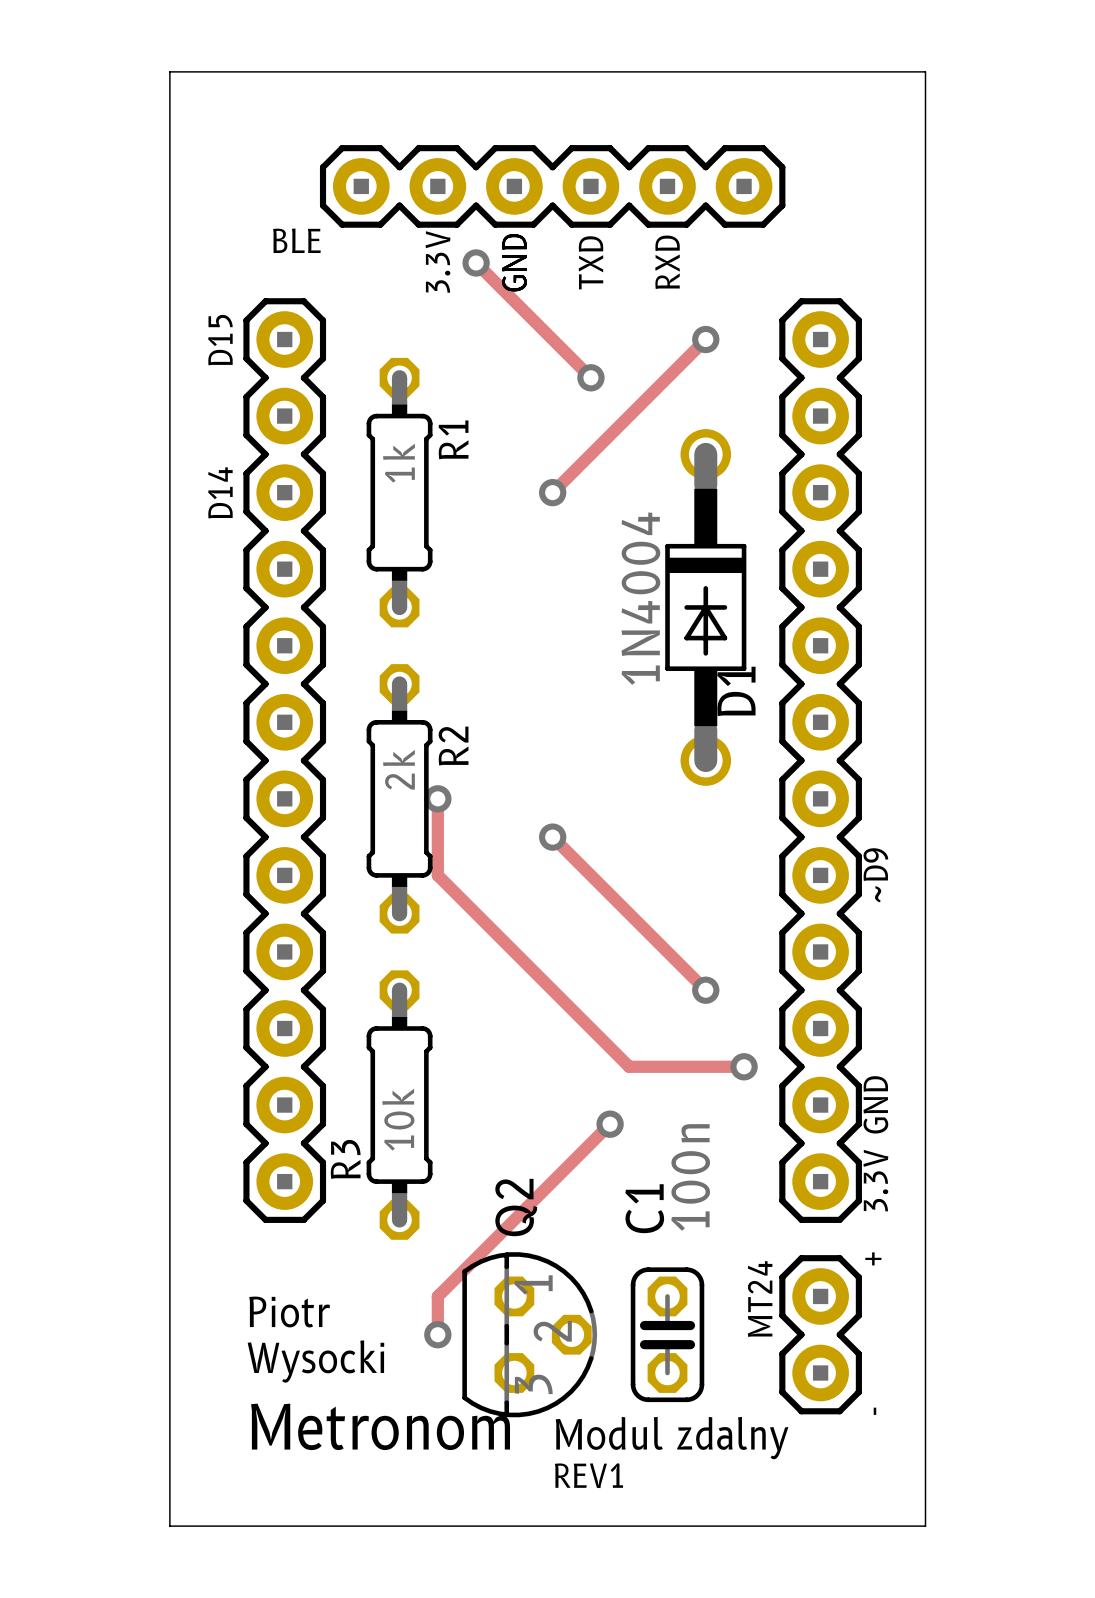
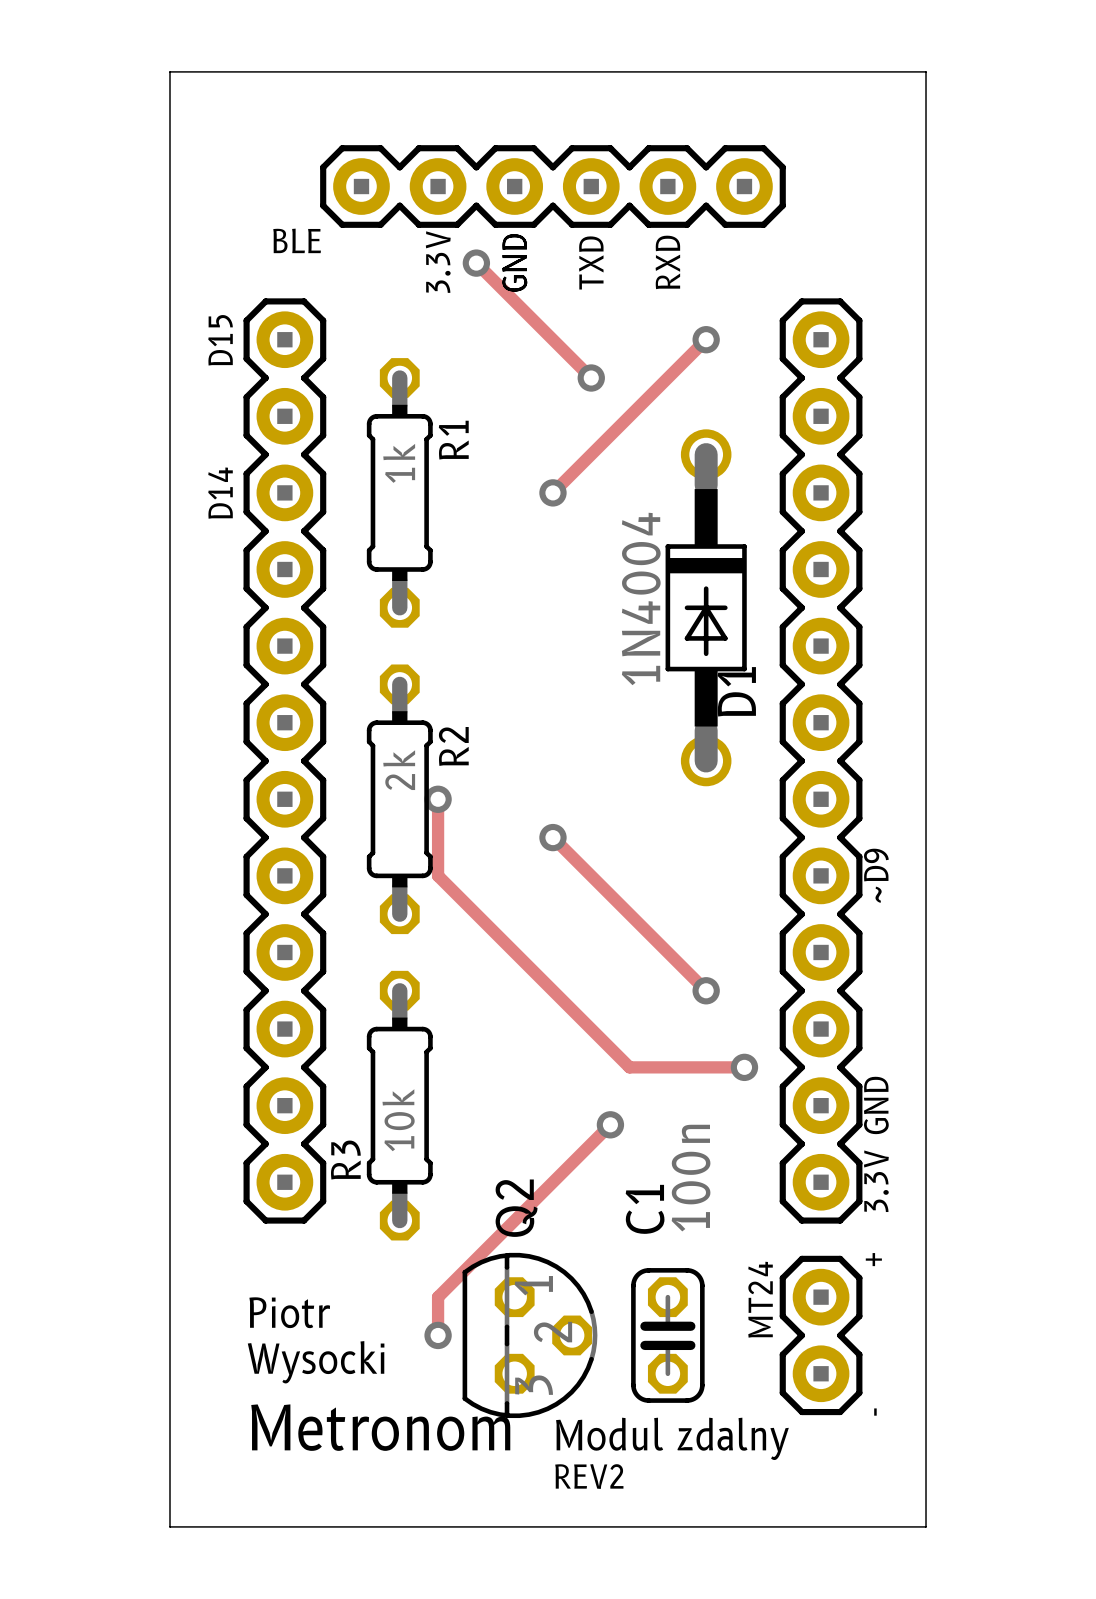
text: REV1 (588, 1475) -> REV2 (589, 1476)

